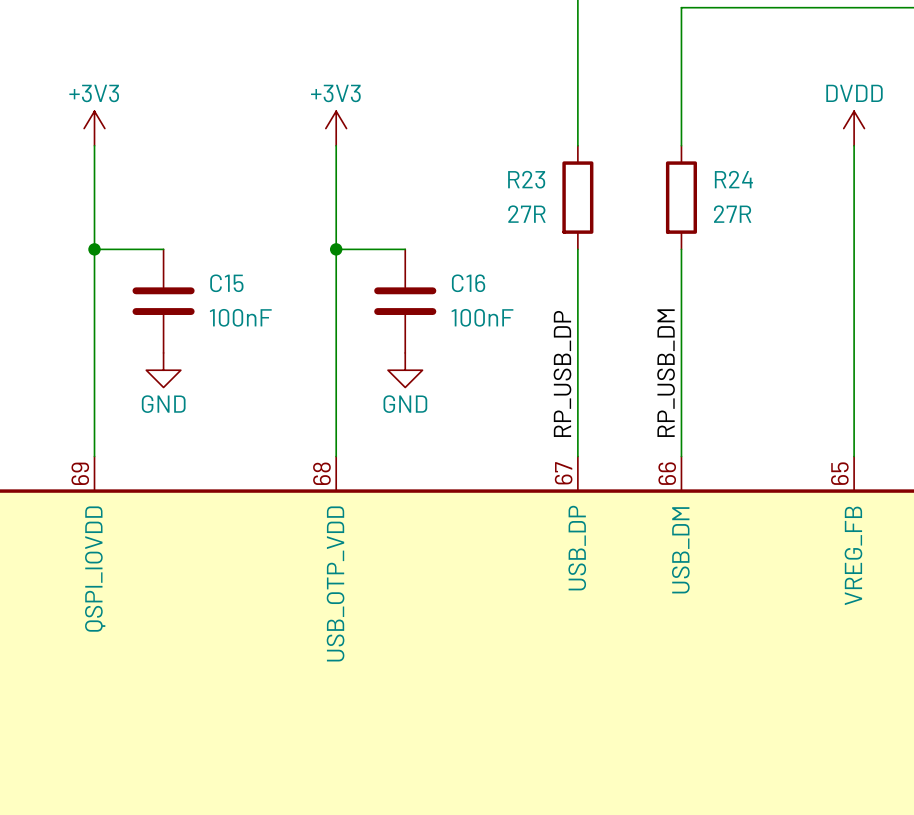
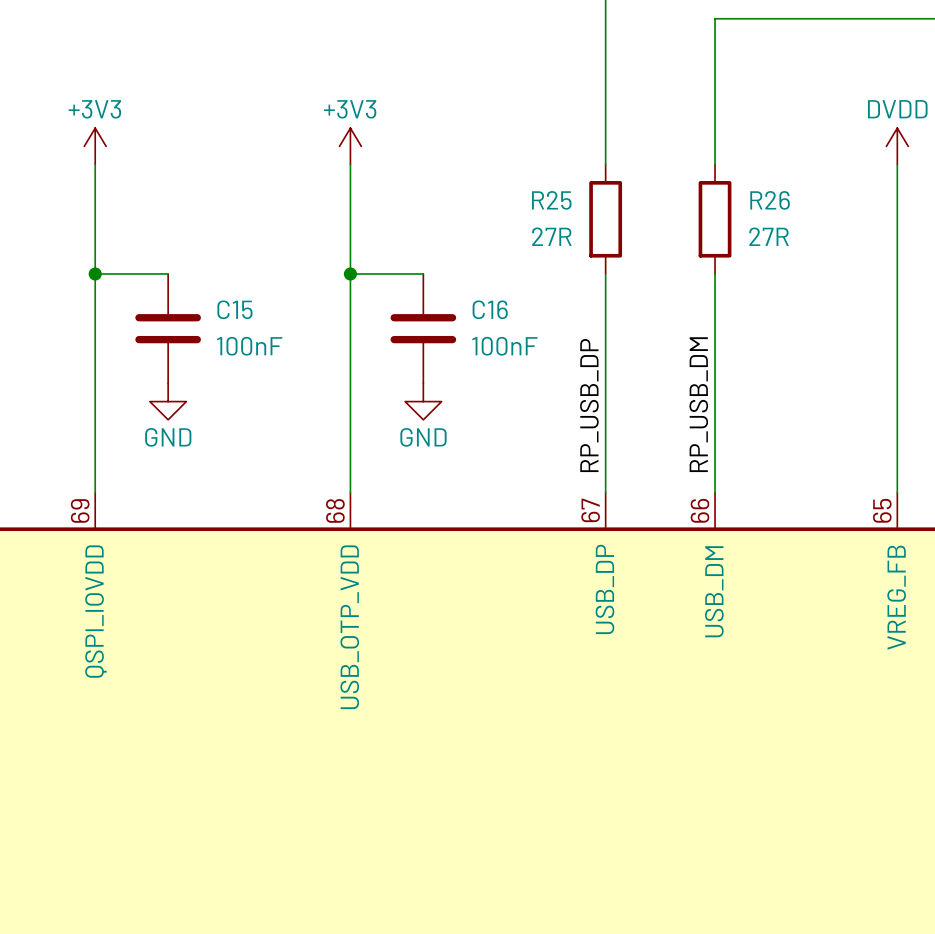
R23 name: R23 (526, 179) -> R25 (551, 200)
R24 name: R24 (733, 179) -> R26 (770, 200)

